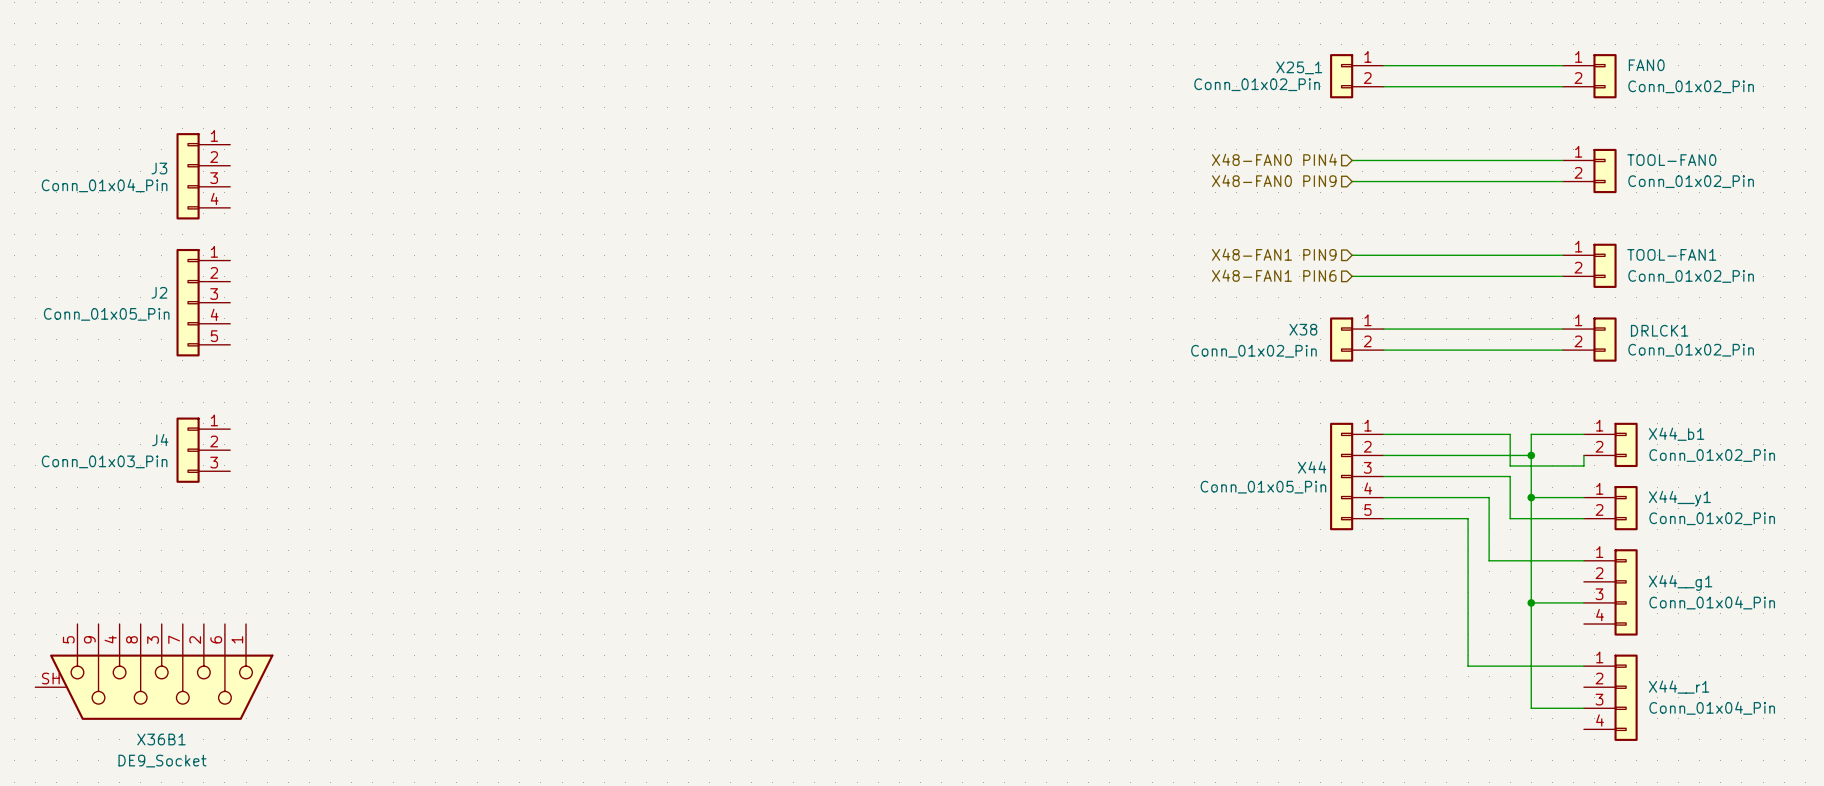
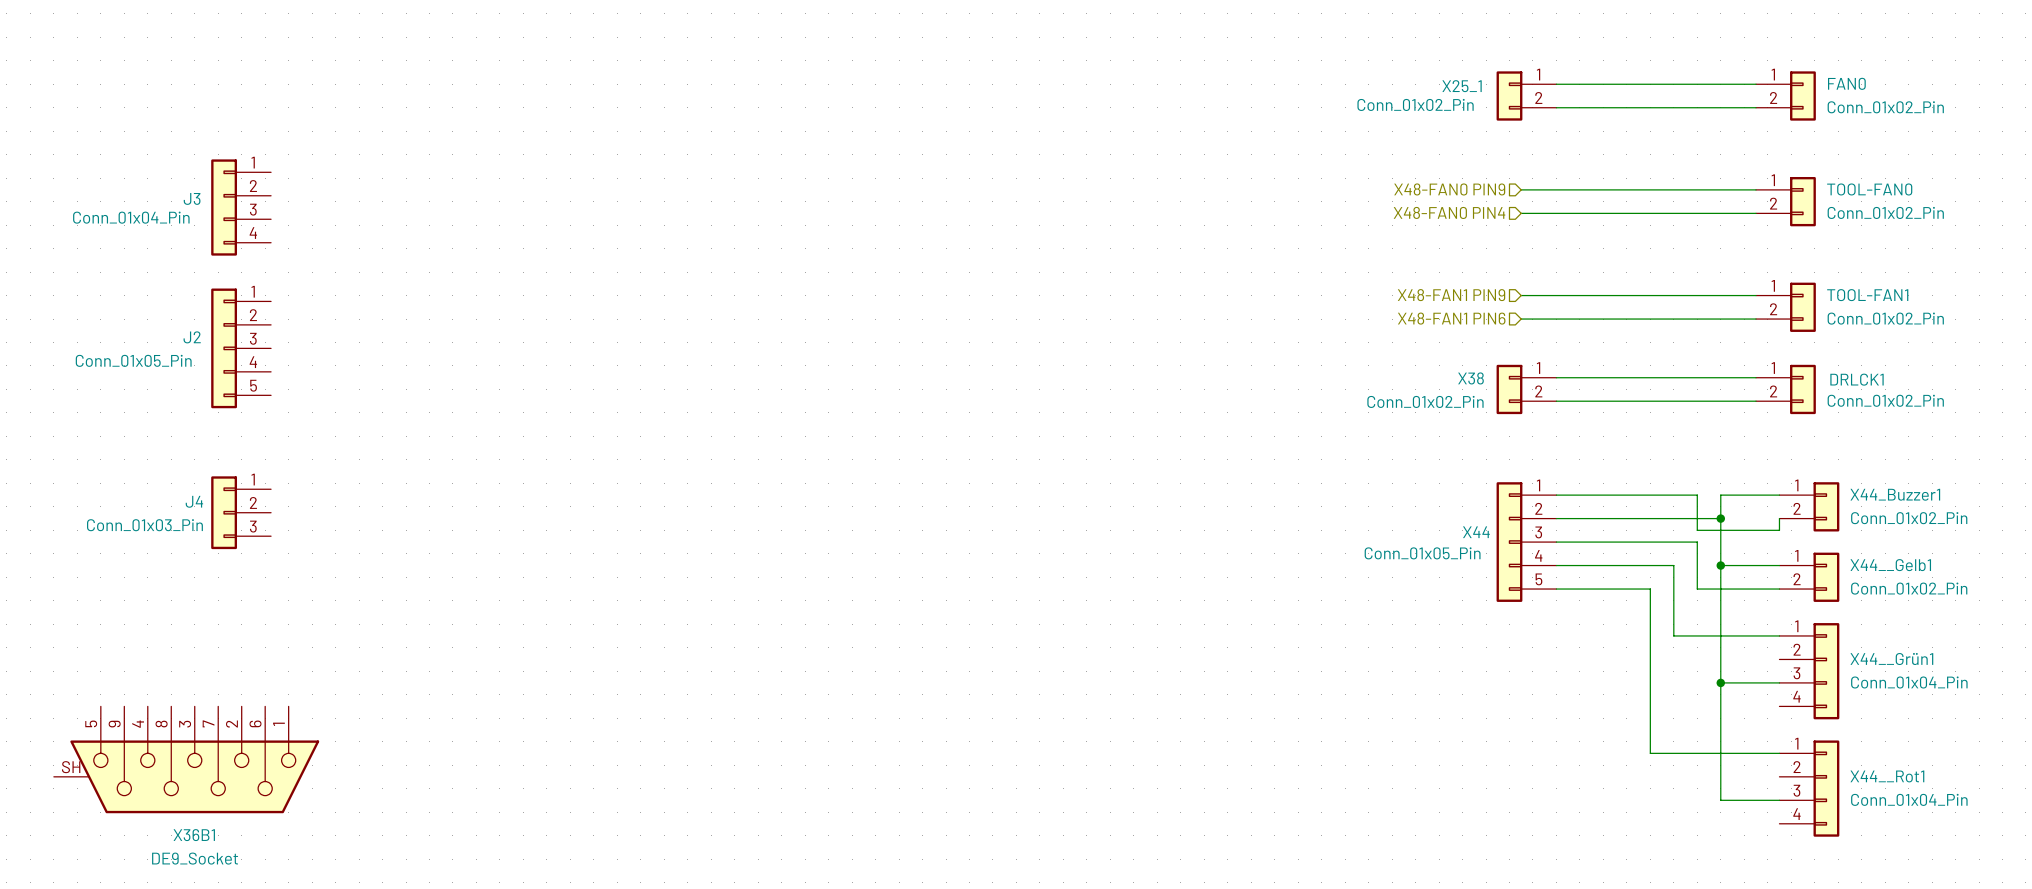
hierarchical label: X48-FAN0 PIN4 (1274, 159) -> X48-FAN0 PIN9 (1449, 189)
hierarchical label: X48-FAN0 PIN9 (1274, 180) -> X48-FAN0 PIN4 (1449, 212)
X44_b1 name: X44_b1 (1676, 434) -> X44_Buzzer1 (1895, 494)
X44__y1 name: X44__y1 (1679, 498) -> X44__Gelb1 (1890, 565)
X44__g1 name: X44__g1 (1680, 582) -> X44__Grün1 (1891, 659)
X44__r1 name: X44__r1 (1679, 687) -> X44__Rot1 (1887, 776)

